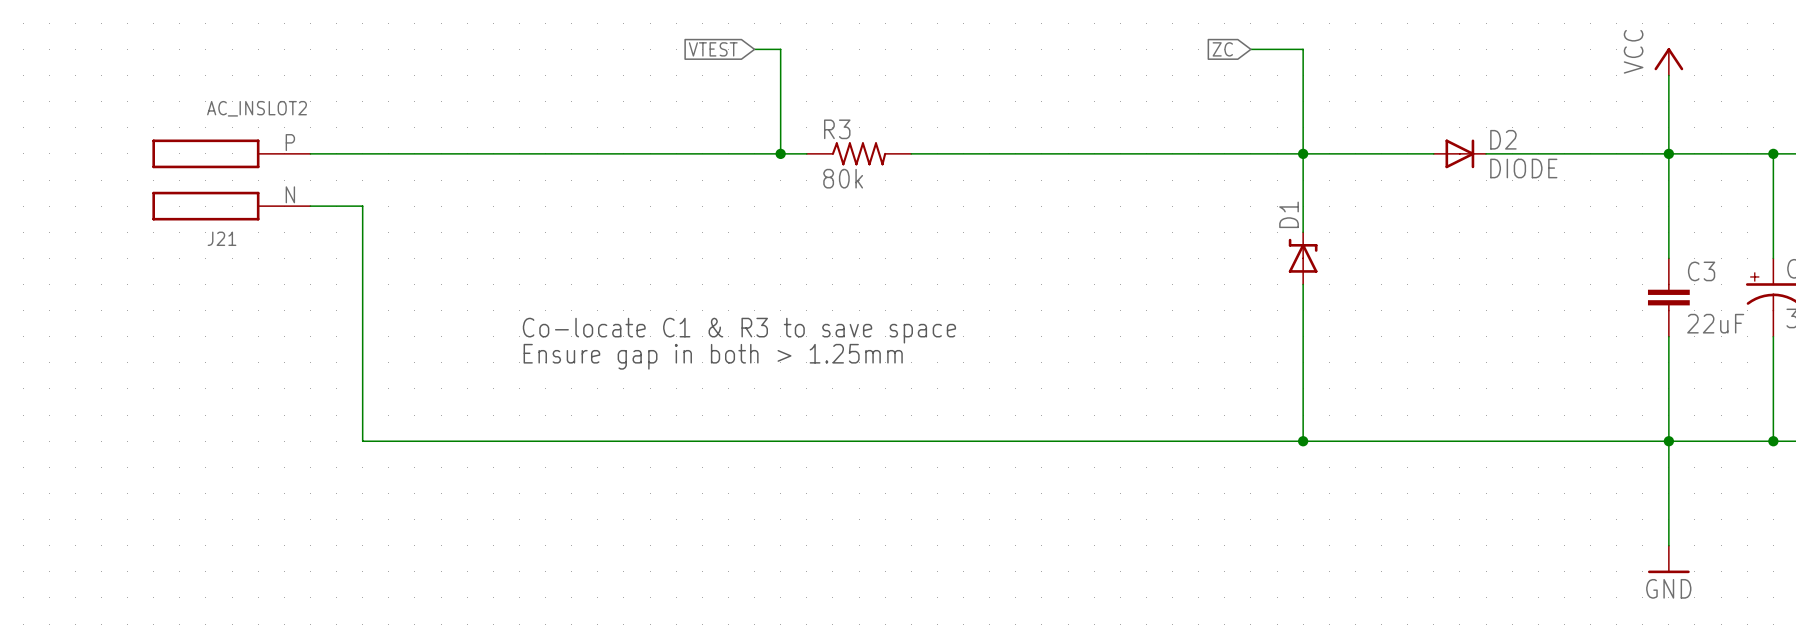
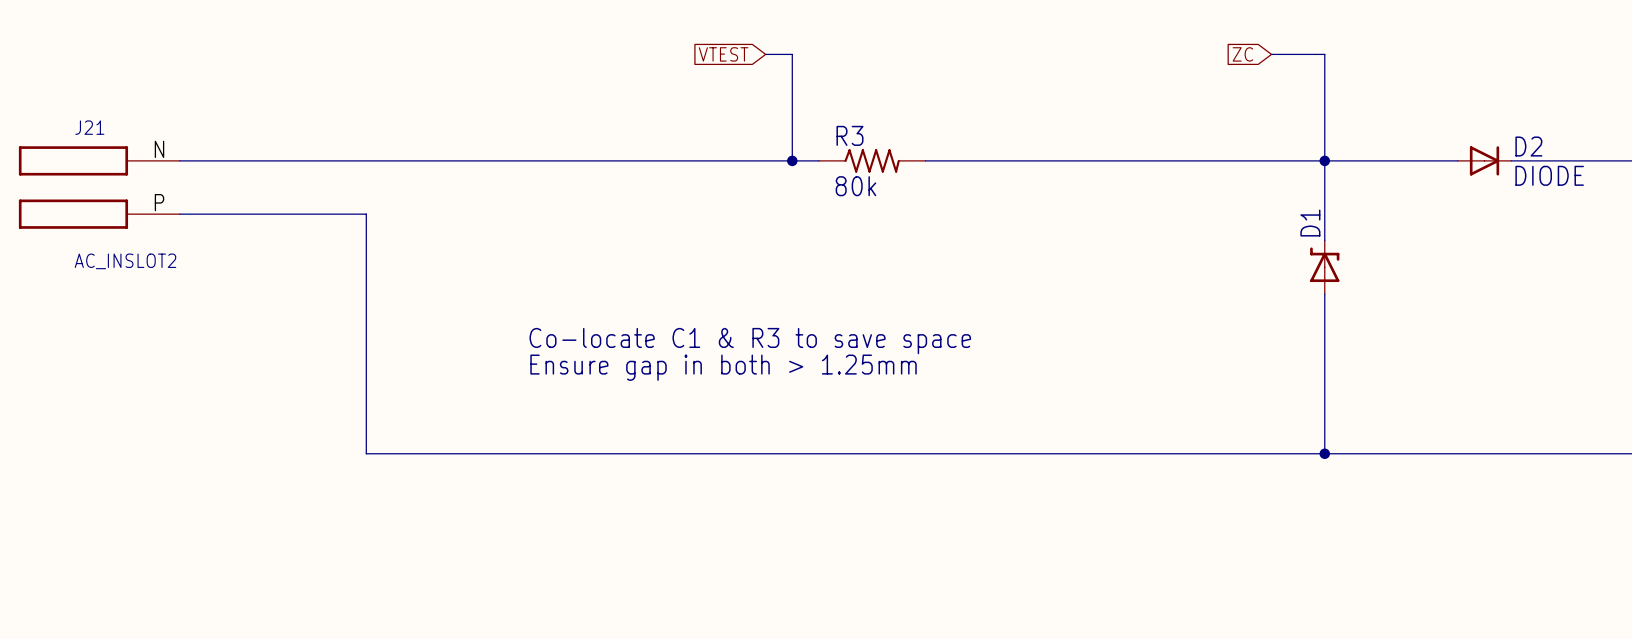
wire: none -> (179, 160) (313, 160)
J21 flip: as is (205, 180) -> up-down (73, 187)
J21 position: (231, 180) -> (99, 187)
wire: none -> (179, 214) (313, 214)

